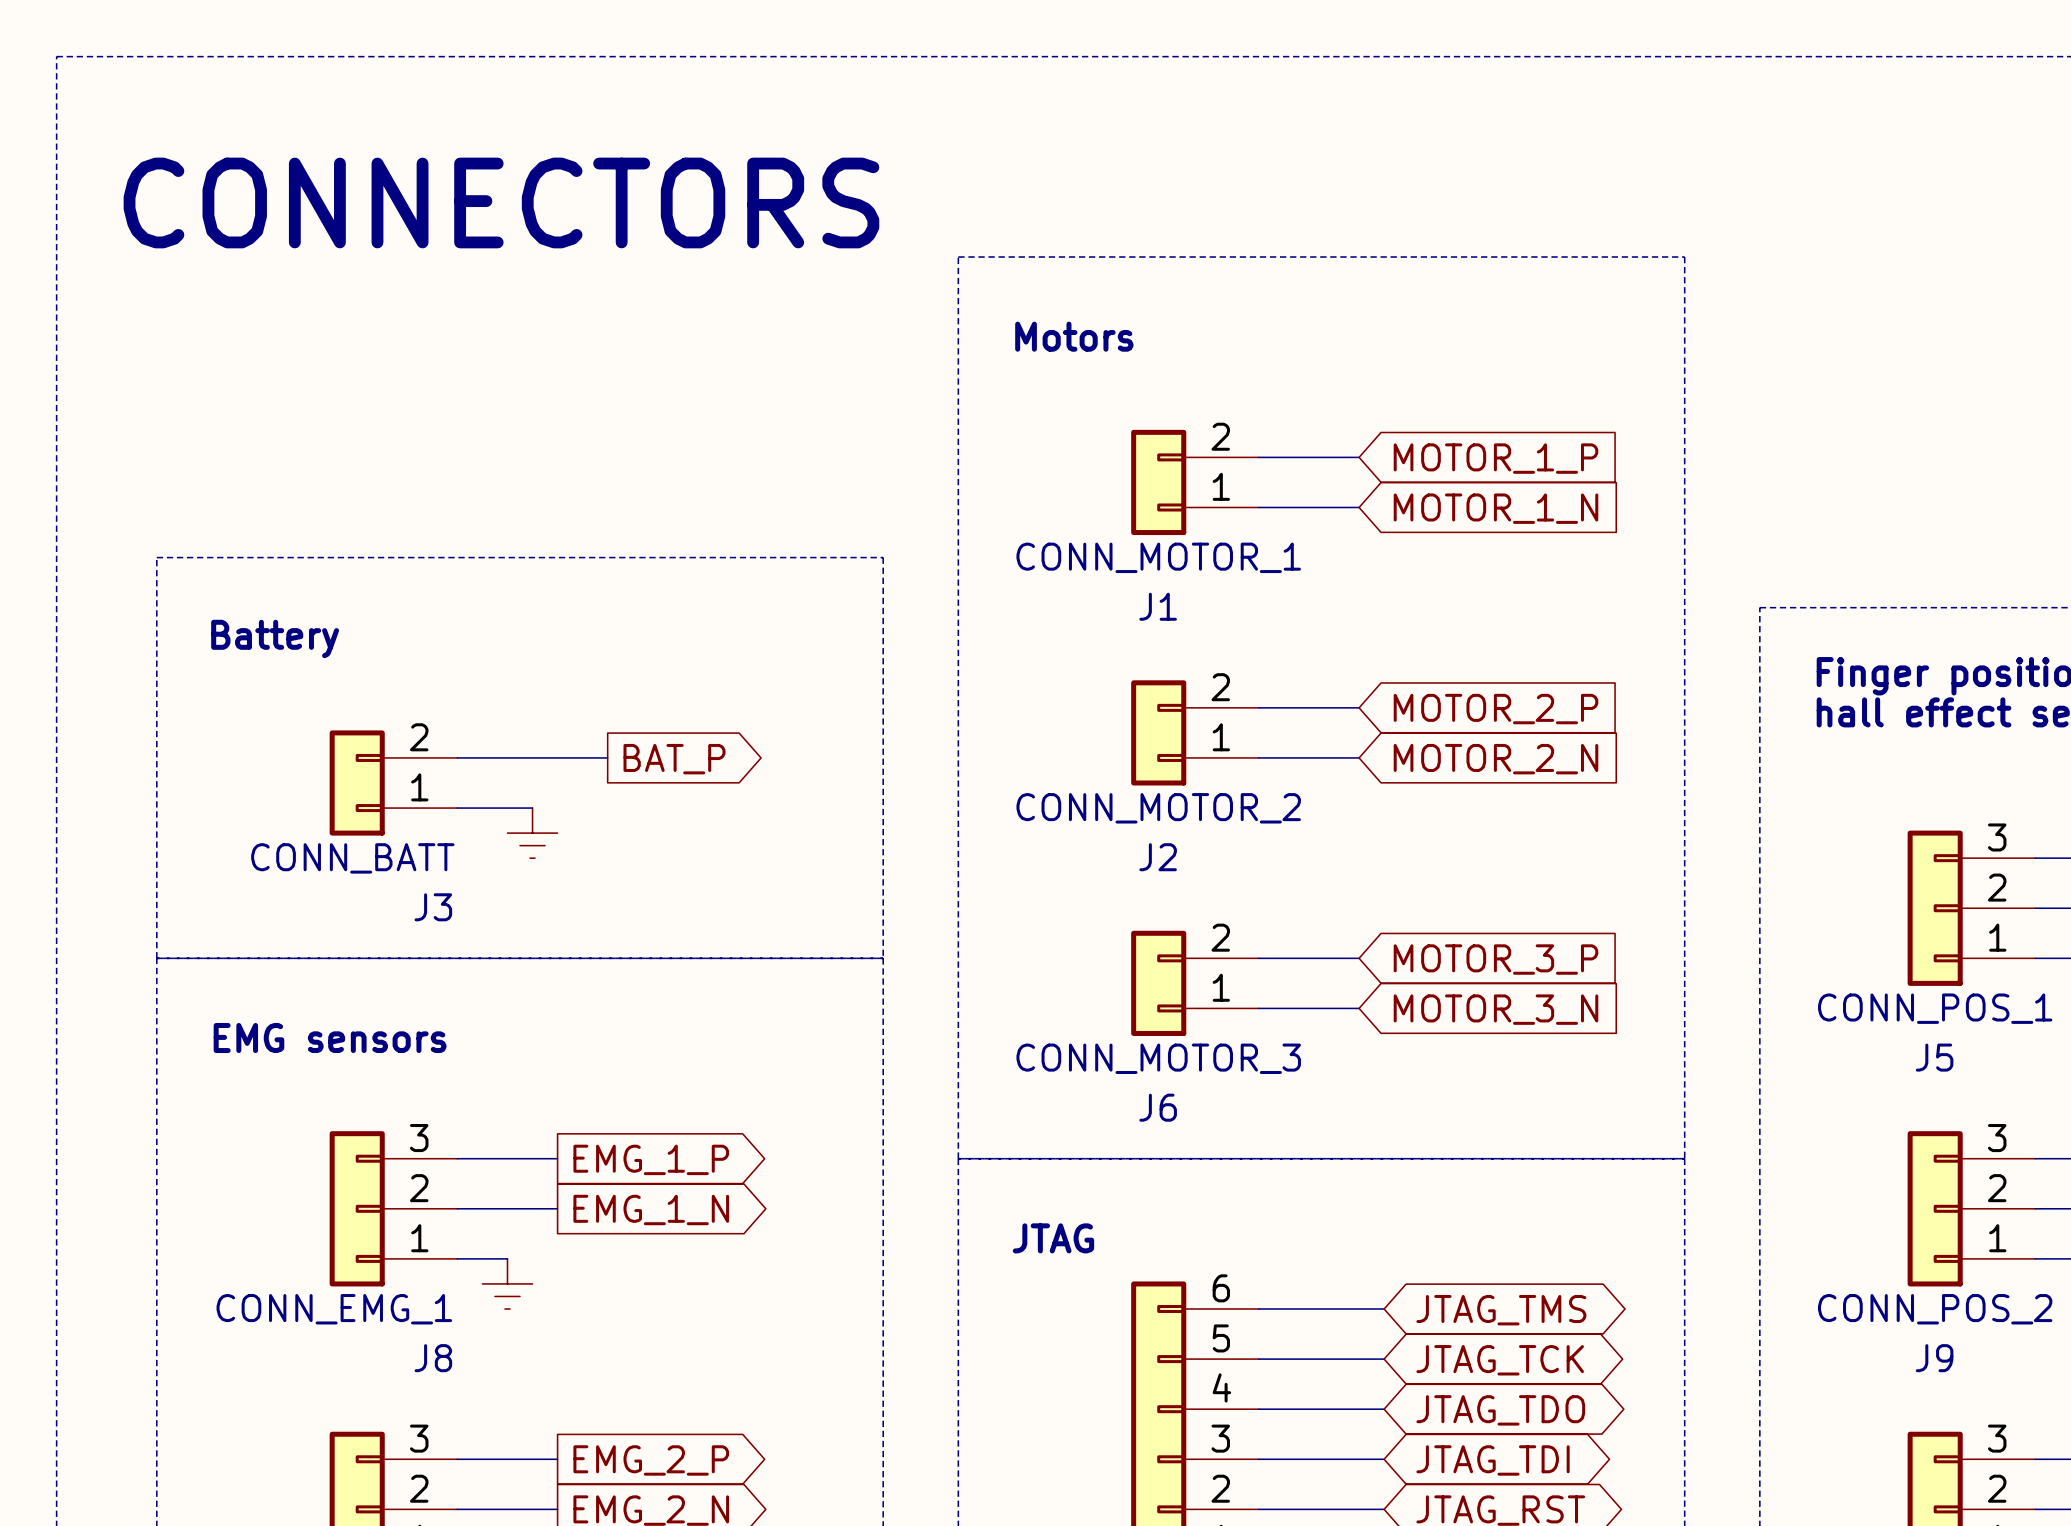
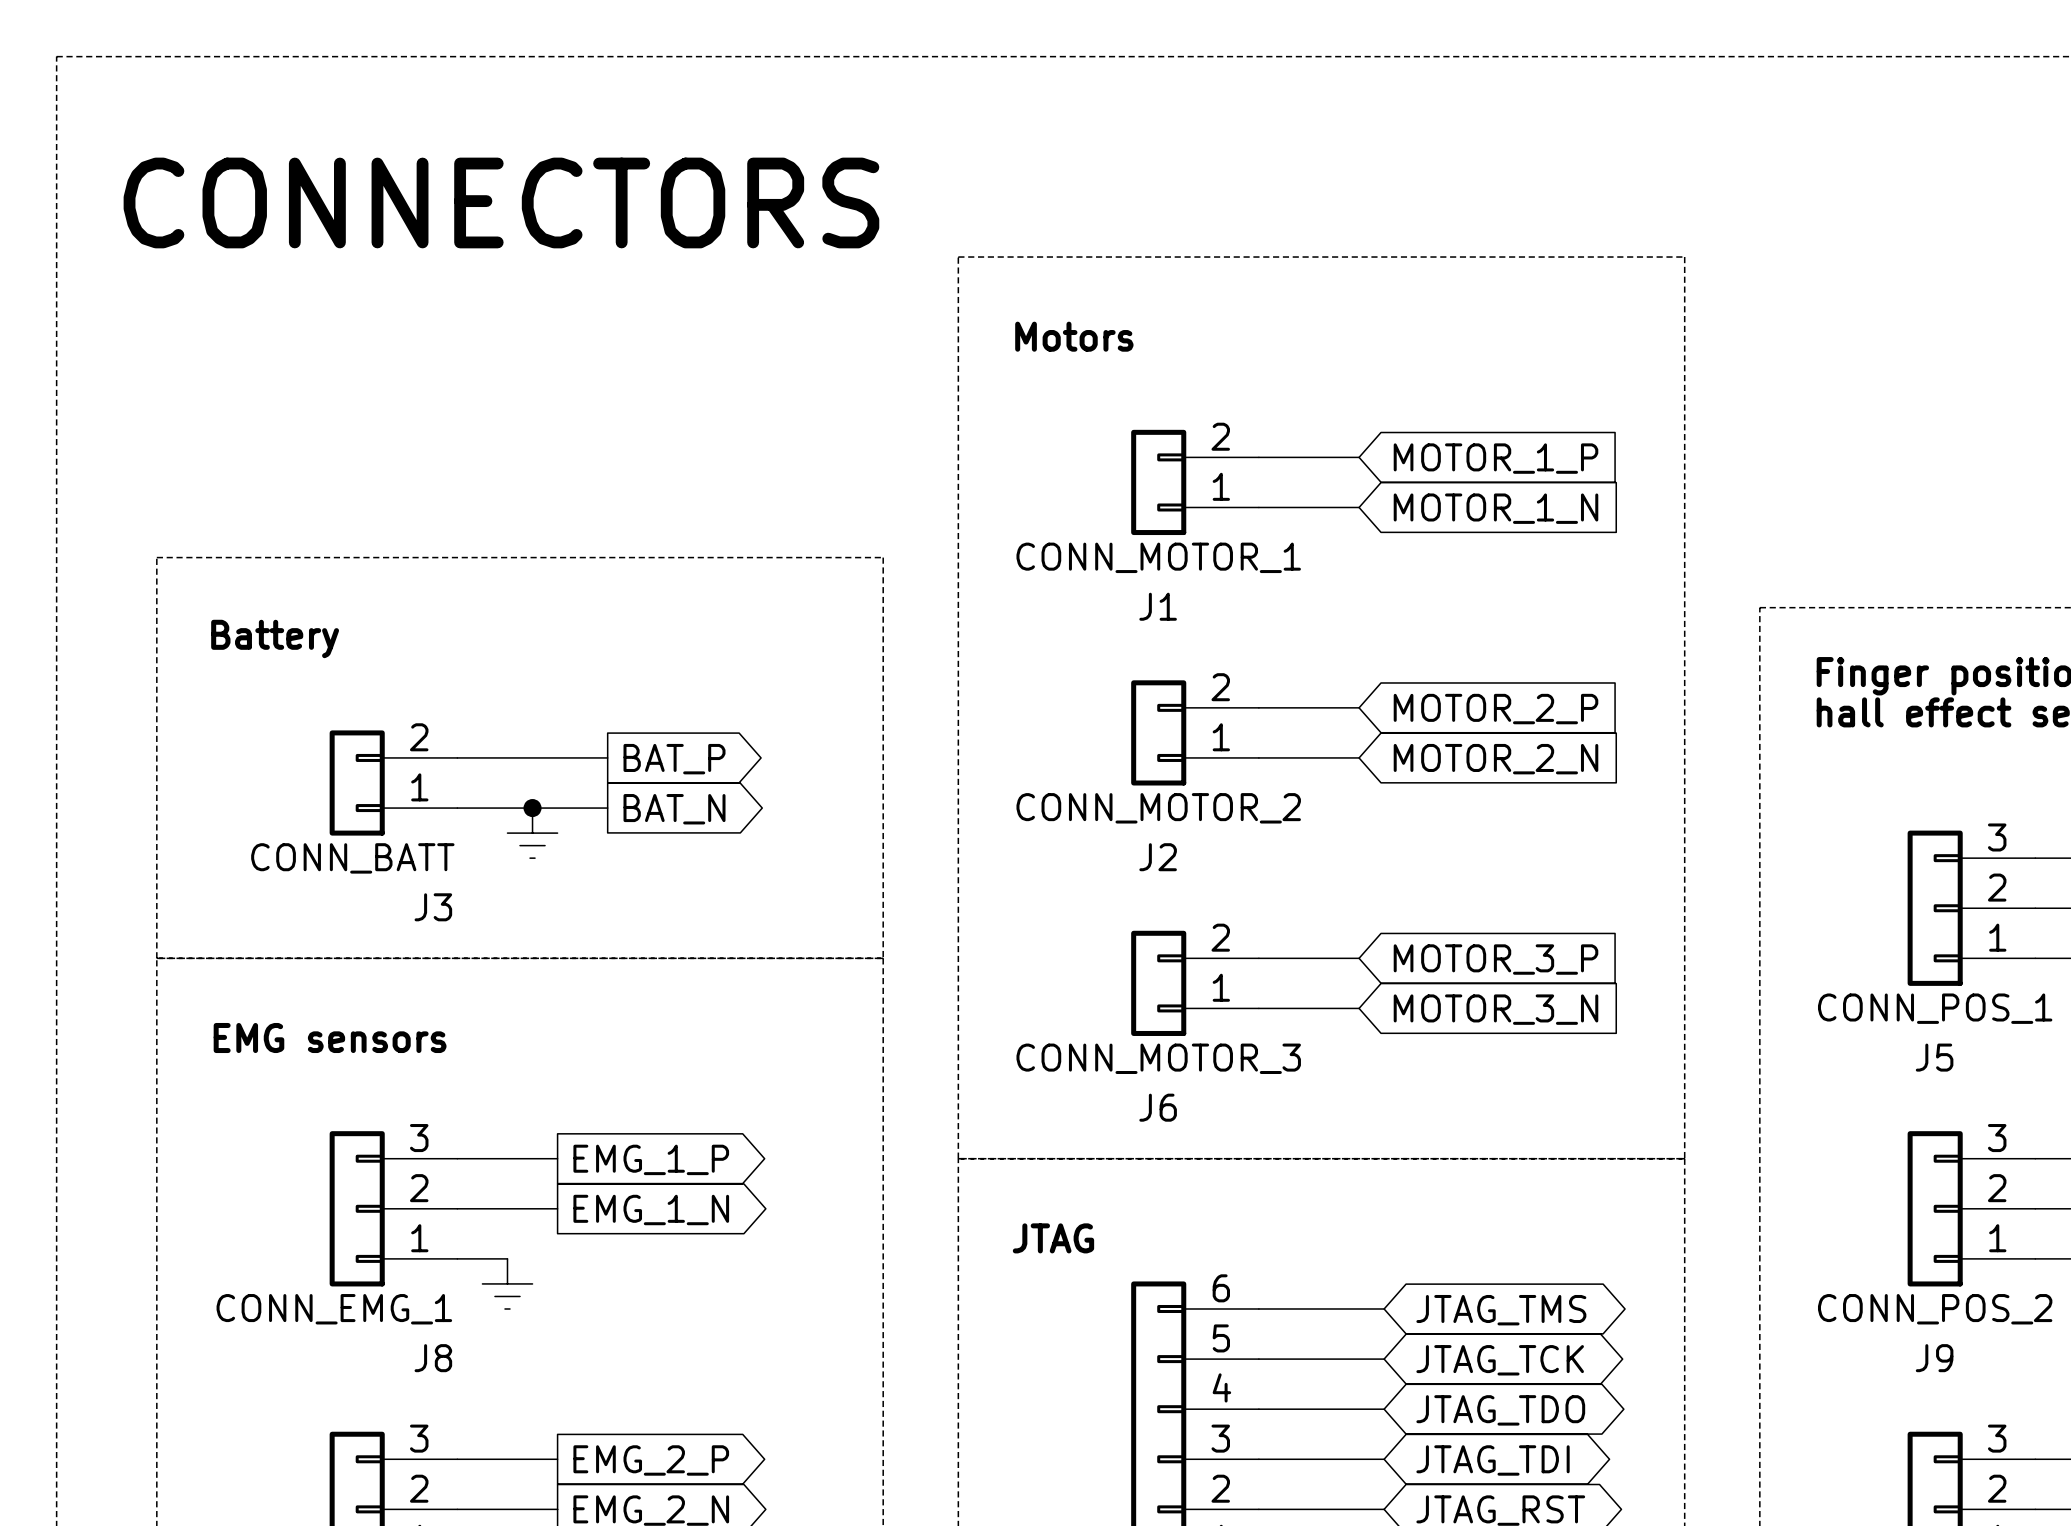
wire: none -> (532, 808) (607, 808)
junction: none -> (532, 808)
global label: none -> BAT_N (674, 809)

